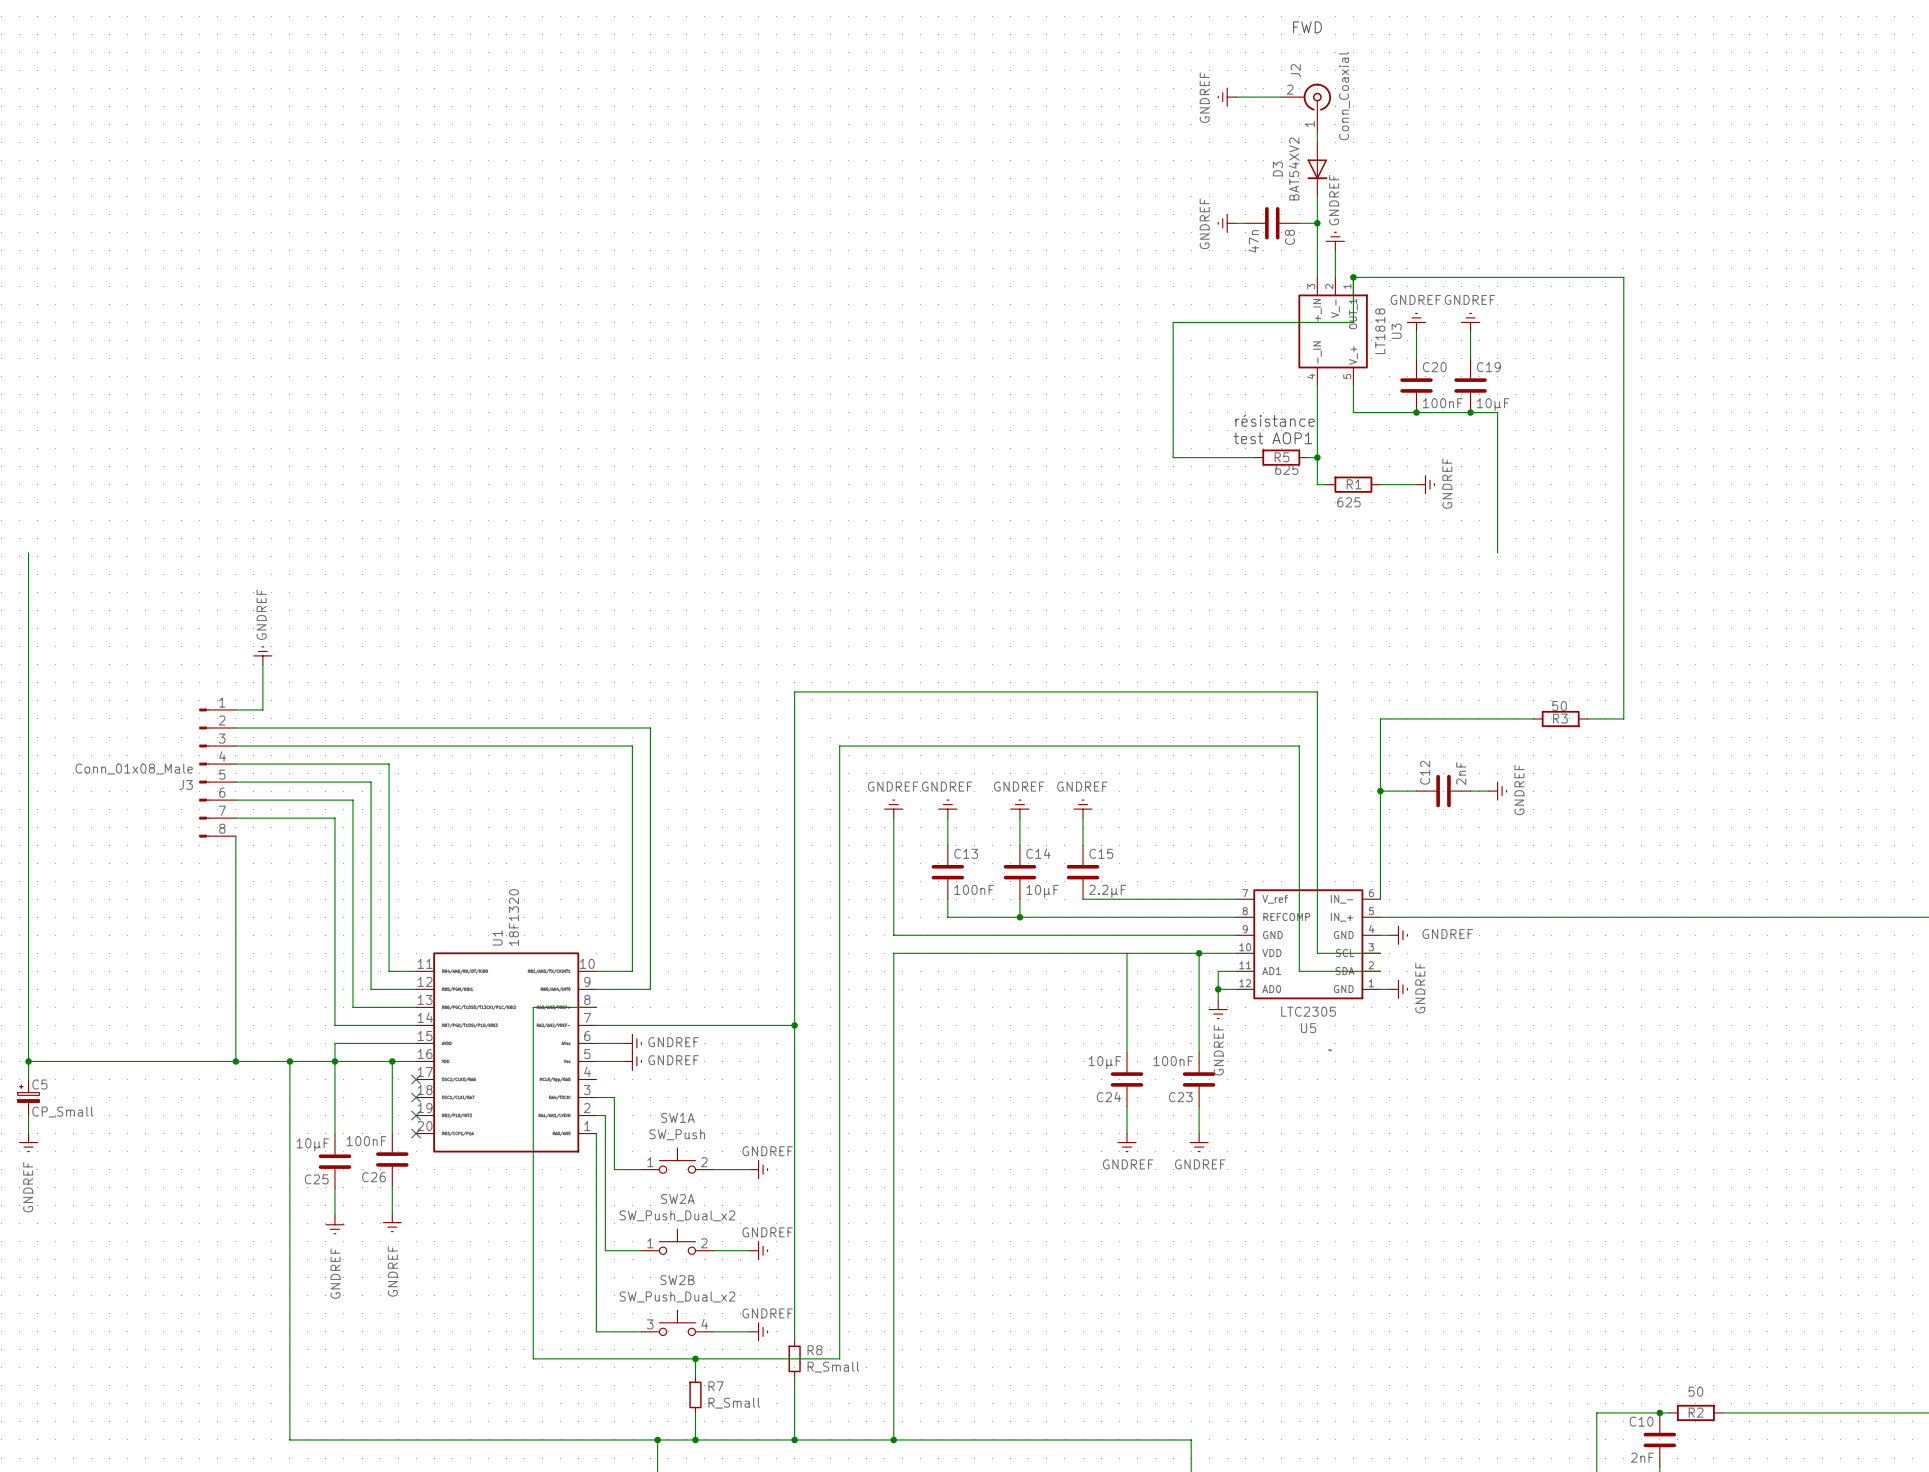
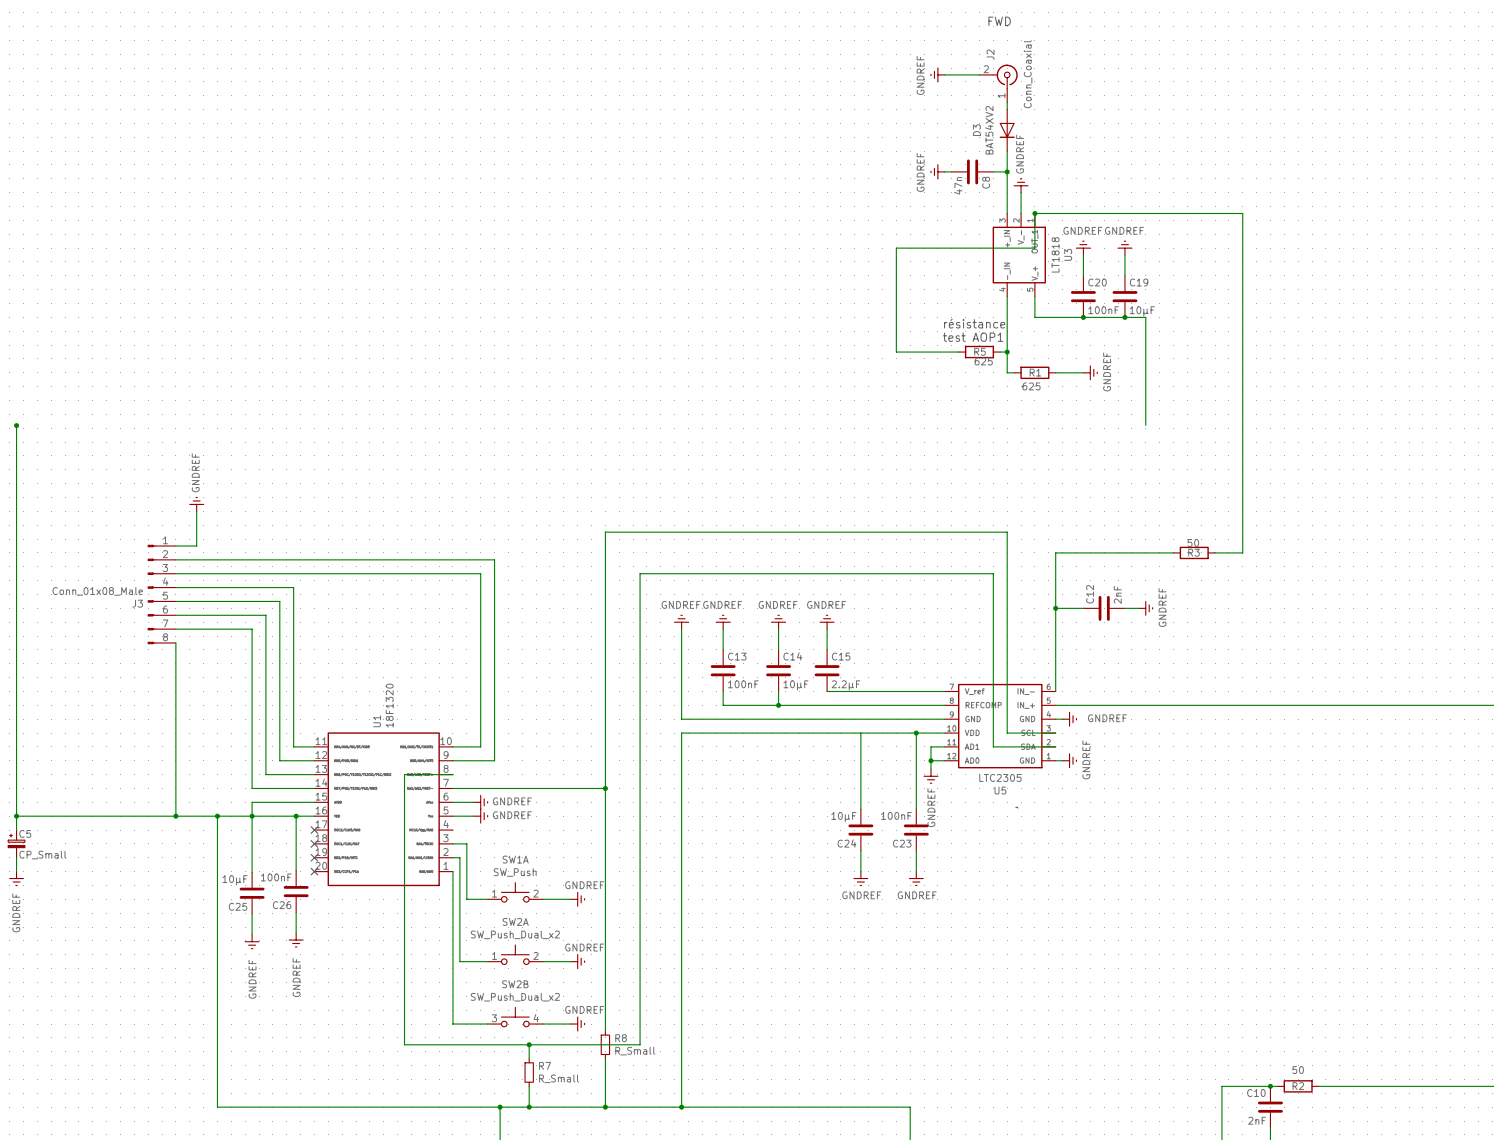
junction: none -> (16, 425)

